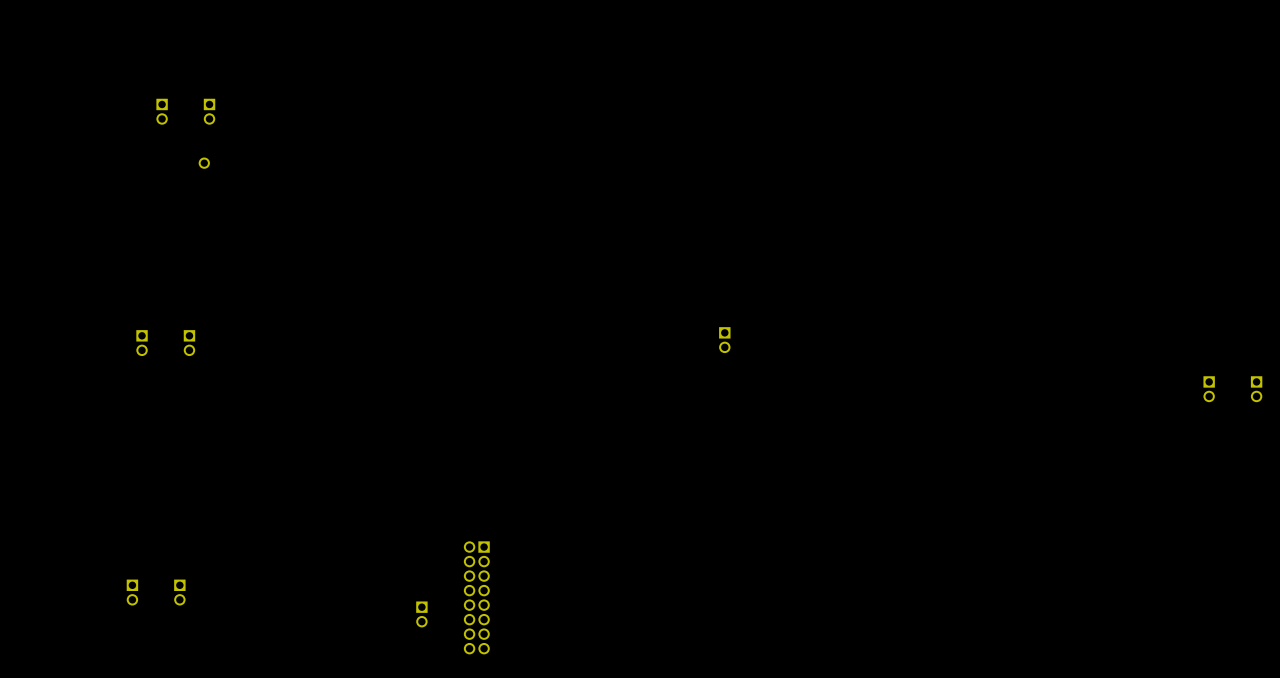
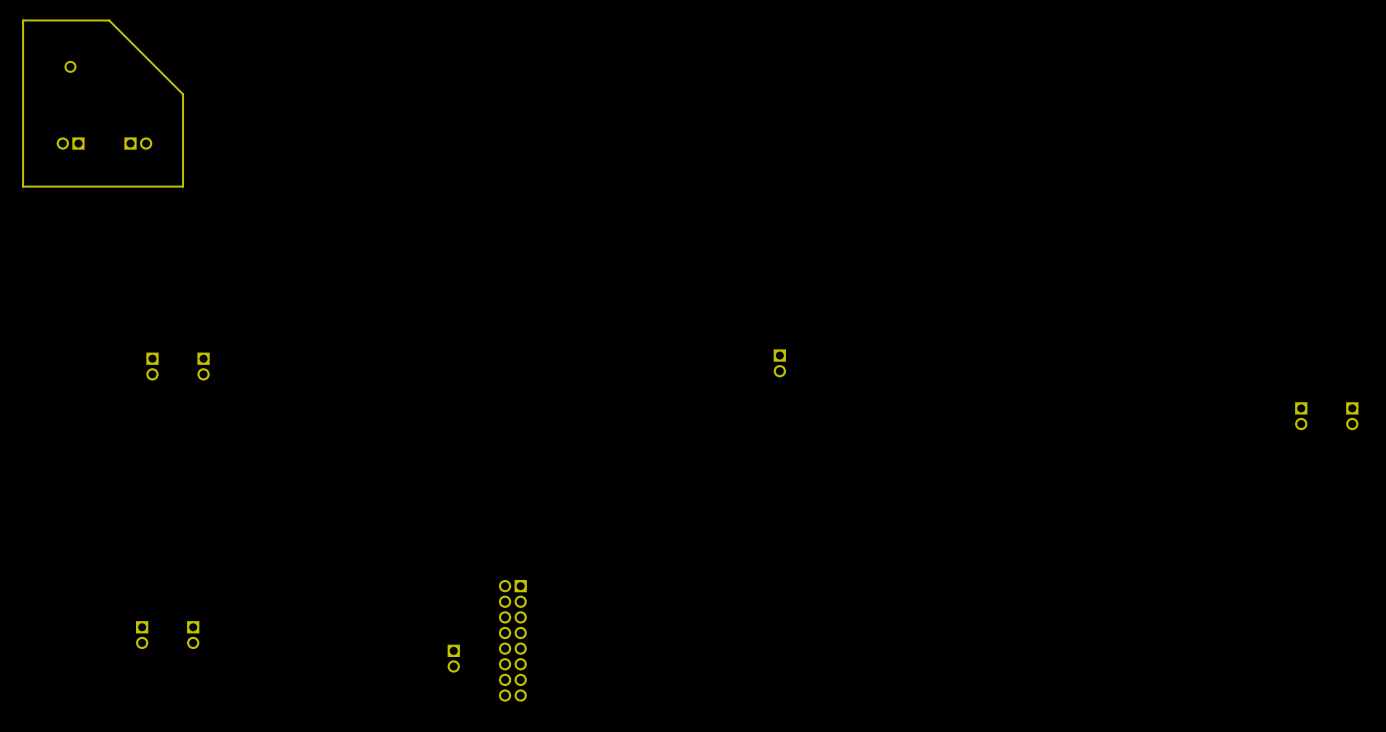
board edge: none -> (109, 20) (183, 94) (183, 186) (23, 186) (23, 20) (109, 20)
part rotation: 0° (162, 111) -> 90° counterclockwise (138, 143)
part position: (162, 111) -> (138, 143)
part: (209, 111) -> none
part: none -> (70, 143)
part position: (204, 163) -> (70, 66)

